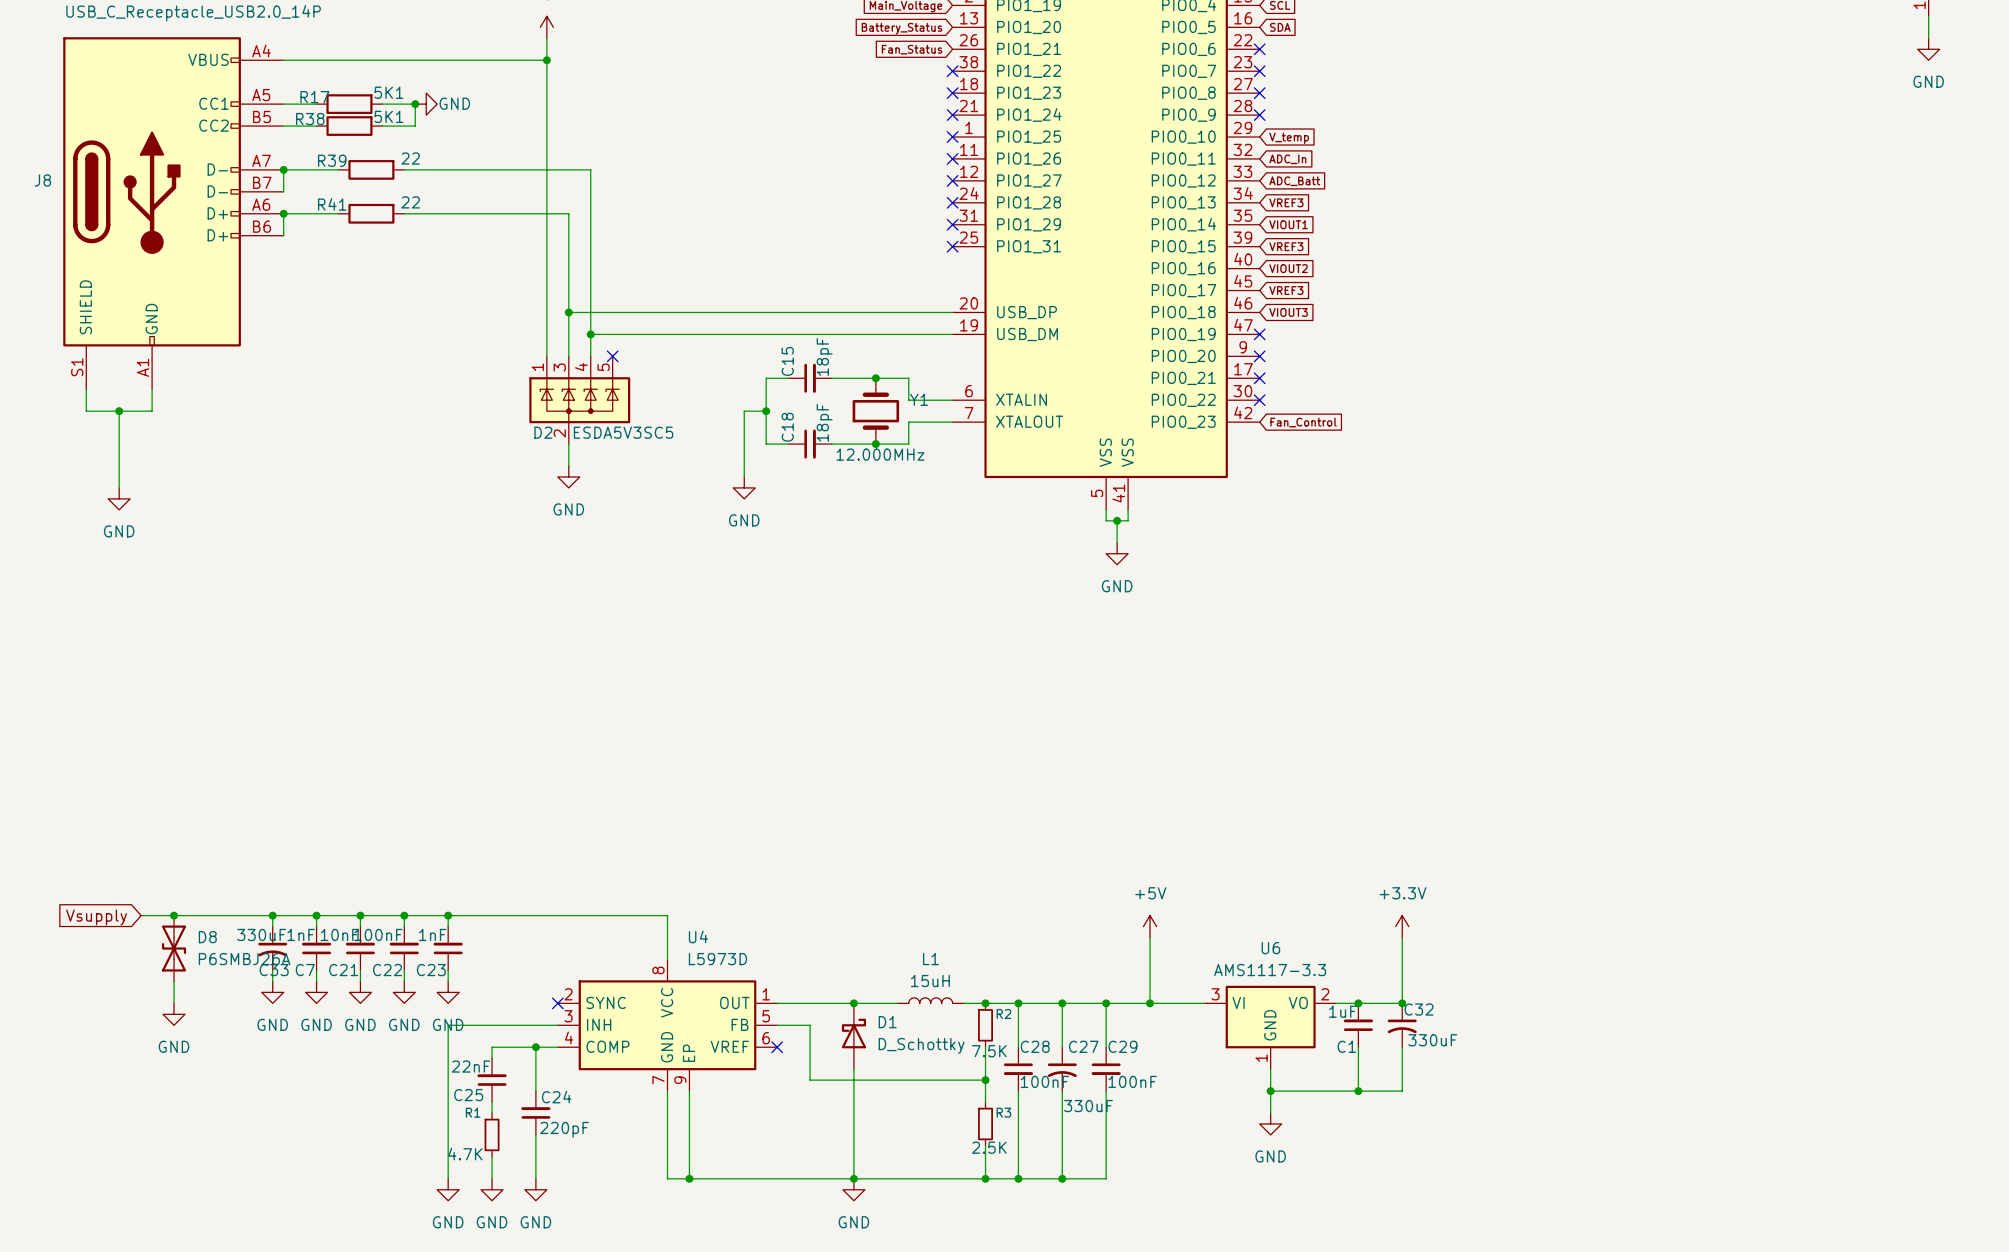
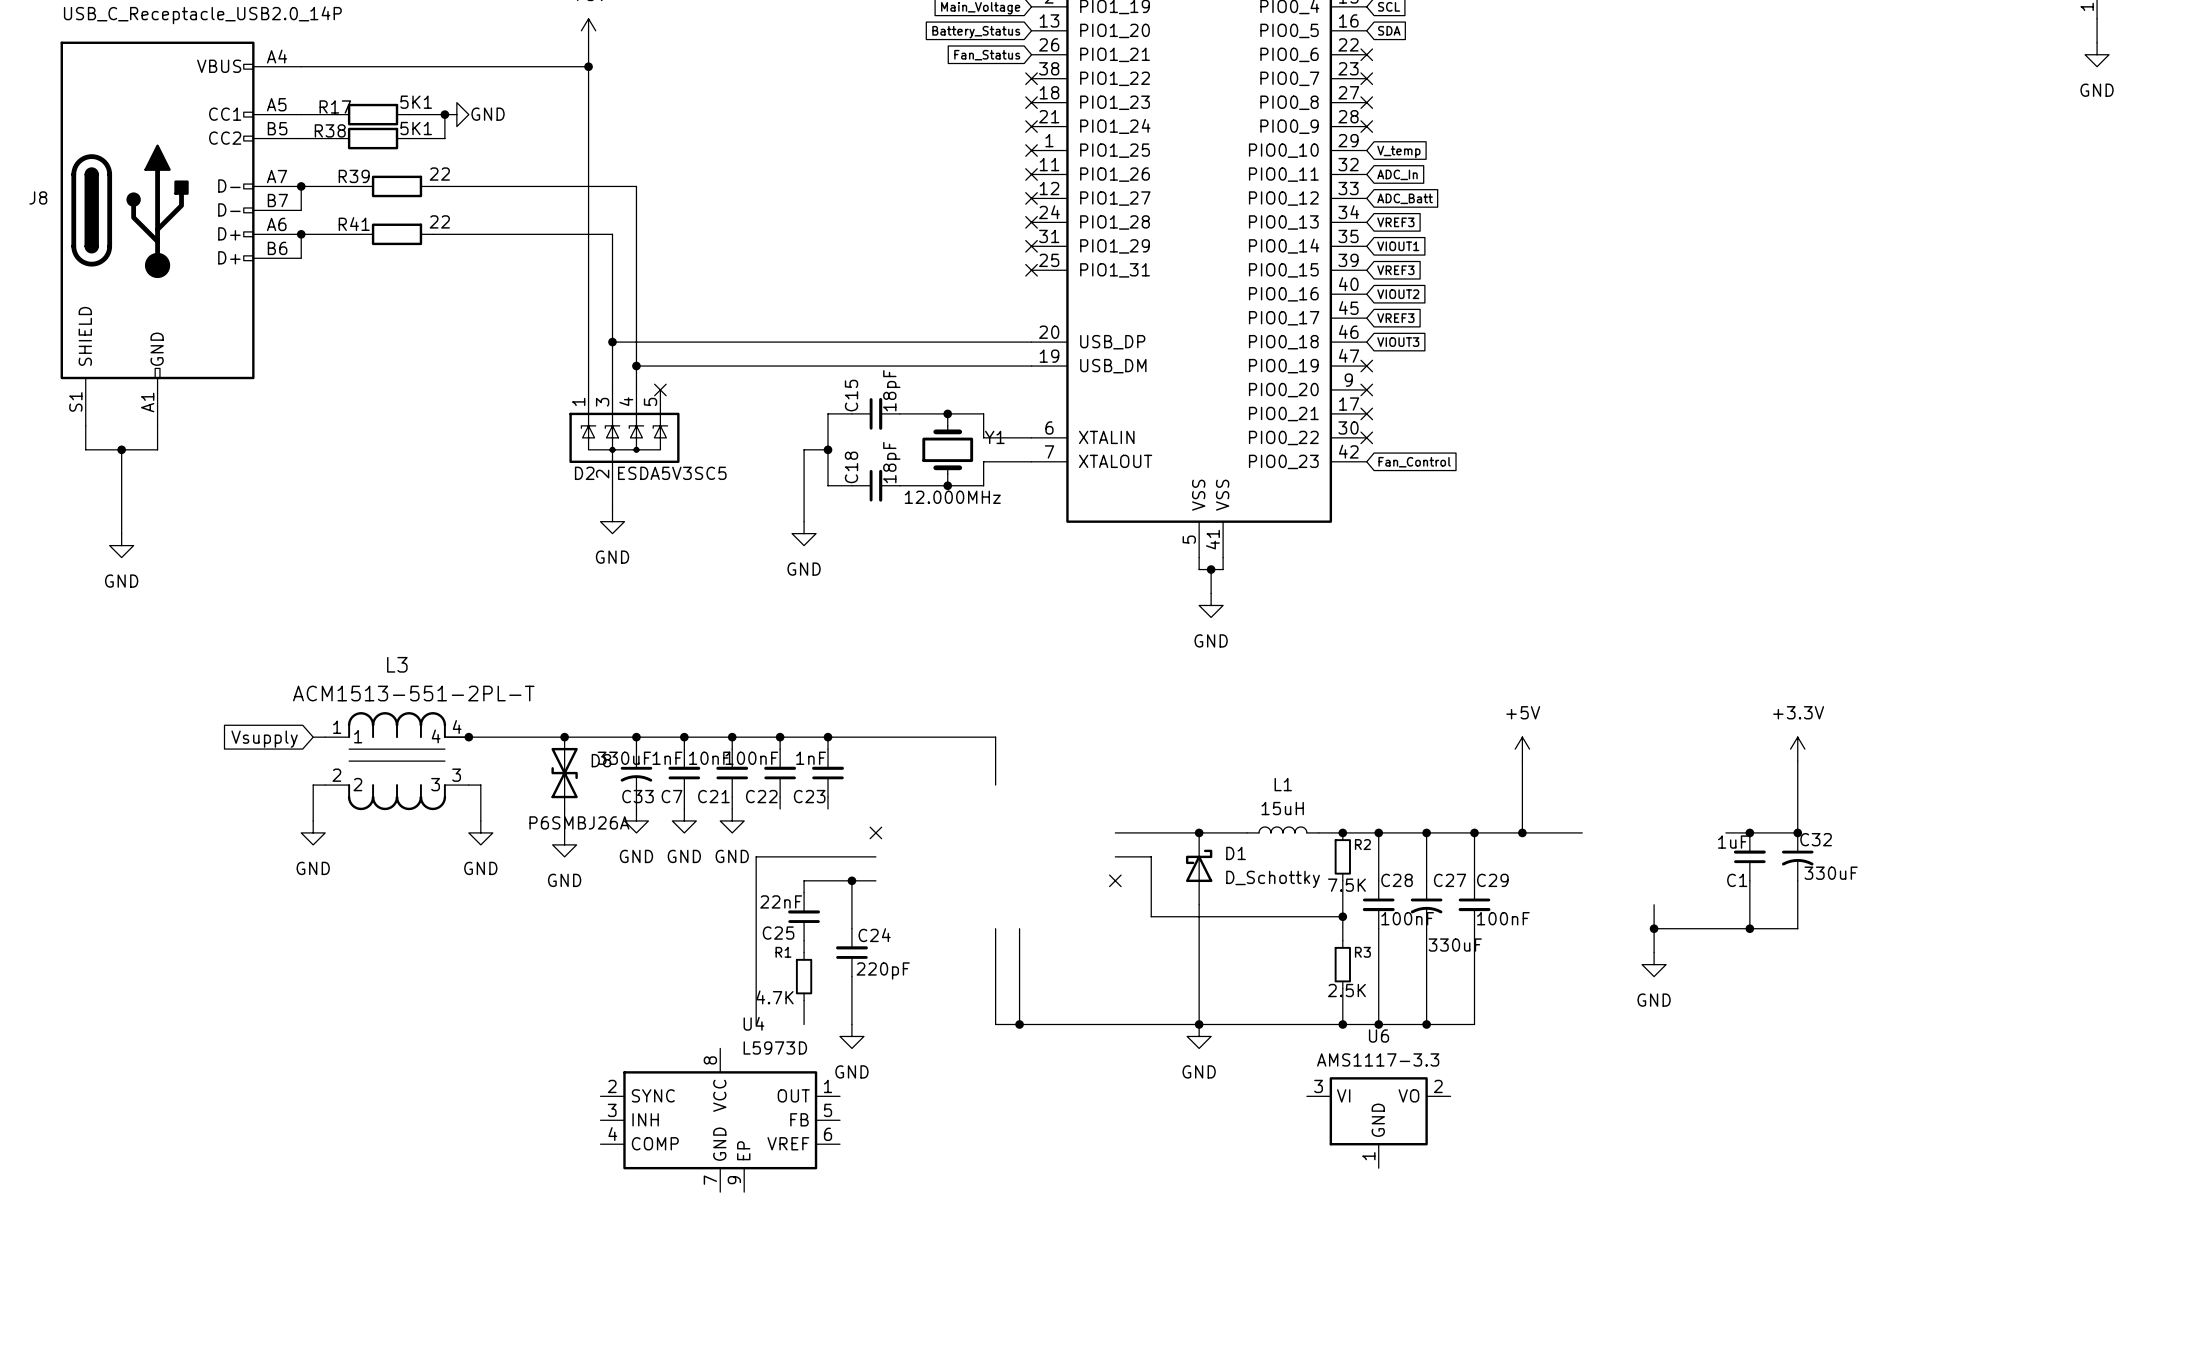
wire: none -> (313, 737) (325, 737)
wire: none -> (444, 737) (995, 737) (995, 785)
junction: none -> (468, 737)
junction: none -> (564, 737)
wire: none -> (636, 737) (636, 749)
junction: none -> (636, 737)
wire: none -> (684, 737) (684, 749)
junction: none -> (684, 737)
wire: none -> (732, 737) (732, 749)
junction: none -> (732, 737)
wire: none -> (780, 737) (780, 749)
junction: none -> (780, 737)
wire: none -> (828, 737) (828, 749)
junction: none -> (828, 737)
global label: none -> Vsupply (264, 739)
power symbol: none -> +5V (1522, 749)
power symbol: none -> +3.3V (1797, 749)
L3: none -> ACM1513-551-2PL-T (397, 761)
wire: none -> (1522, 761) (1522, 832)
wire: none -> (1797, 761) (1797, 832) (1725, 832)
wire: none -> (325, 785) (313, 785) (313, 820)
wire: none -> (468, 785) (480, 785) (480, 820)
wire: none -> (636, 797) (636, 808)
wire: none -> (684, 797) (684, 808)
wire: none -> (732, 797) (732, 808)
wire: none -> (780, 797) (780, 808)
wire: none -> (828, 797) (828, 808)
wire: none -> (564, 808) (564, 832)
power symbol: none -> GND (636, 820)
power symbol: none -> GND (684, 820)
power symbol: none -> GND (732, 820)
power symbol: none -> GND (313, 832)
power symbol: none -> GND (480, 832)
no-connect mark: none -> (875, 832)
wire: none -> (1115, 832) (1247, 832)
junction: none -> (1199, 832)
wire: none -> (1318, 832) (1582, 832)
junction: none -> (1342, 832)
wire: none -> (1378, 832) (1378, 880)
junction: none -> (1378, 832)
wire: none -> (1426, 832) (1426, 880)
junction: none -> (1426, 832)
wire: none -> (1474, 832) (1474, 880)
junction: none -> (1474, 832)
junction: none -> (1522, 832)
junction: none -> (1749, 832)
junction: none -> (1797, 832)
power symbol: none -> GND (564, 844)
wire: none -> (875, 856) (756, 856) (756, 1024)
wire: none -> (1115, 856) (1151, 856) (1151, 916) (1342, 916)
wire: none -> (851, 880) (851, 928)
junction: none -> (851, 880)
wire: none -> (875, 880) (804, 880) (804, 892)
no-connect mark: none -> (1115, 880)
wire: none -> (1342, 880) (1342, 940)
wire: none -> (1749, 880) (1749, 928)
wire: none -> (1797, 880) (1797, 928) (1654, 928)
wire: none -> (1199, 904) (1199, 1024)
wire: none -> (1654, 904) (1654, 952)
junction: none -> (1342, 916)
wire: none -> (995, 928) (995, 1024) (1474, 1024) (1474, 928)
wire: none -> (1019, 928) (1019, 1024)
wire: none -> (1378, 928) (1378, 1024)
wire: none -> (1426, 928) (1426, 1024)
junction: none -> (1654, 928)
junction: none -> (1749, 928)
wire: none -> (804, 940) (804, 952)
power symbol: none -> GND (1654, 964)
wire: none -> (851, 976) (851, 1024)
wire: none -> (1342, 988) (1342, 1024)
wire: (141, 915) (667, 915) (667, 959) -> none
junction: (174, 915) -> none
wire: (272, 915) (272, 926) -> none
junction: (272, 915) -> none
wire: (316, 915) (316, 926) -> none
junction: (316, 915) -> none
wire: (360, 915) (360, 926) -> none
junction: (360, 915) -> none
wire: (404, 915) (404, 926) -> none
junction: (404, 915) -> none
wire: (448, 915) (448, 926) -> none
junction: (448, 915) -> none
wire: none -> (804, 1000) (804, 1024)
global label: Vsupply (96, 917) -> none
power symbol: +5V (1150, 926) -> none
power symbol: +3.3V (1402, 926) -> none
junction: none -> (1019, 1024)
junction: none -> (1199, 1024)
wire: (1150, 937) (1150, 1003) -> none
junction: none -> (1342, 1024)
junction: none -> (1378, 1024)
junction: none -> (1426, 1024)
wire: (1402, 937) (1402, 1003) (1336, 1003) -> none
D8 position: (174, 948) -> (564, 773)
C33 position: (272, 948) -> (636, 773)
C7 position: (316, 948) -> (684, 773)
C21 position: (360, 948) -> (732, 773)
C22 position: (404, 948) -> (780, 773)
C23 position: (448, 948) -> (828, 773)
power symbol: none -> GND (851, 1036)
power symbol: none -> GND (1199, 1036)
D8 value position: P6SMBJ26A (244, 959) -> P6SMBJ26A (579, 822)
wire: (272, 970) (272, 981) -> none
wire: (316, 970) (316, 981) -> none
wire: (360, 970) (360, 981) -> none
wire: (404, 970) (404, 981) -> none
wire: (448, 970) (448, 981) -> none
wire: (174, 981) (174, 1003) -> none
power symbol: GND (272, 992) -> none
power symbol: GND (316, 992) -> none
power symbol: GND (360, 992) -> none
power symbol: GND (404, 992) -> none
power symbol: GND (448, 992) -> none
L1 position: (930, 1000) -> (1282, 829)
no-connect mark: (557, 1003) -> none
wire: (777, 1003) (897, 1003) -> none
junction: (853, 1003) -> none
wire: (963, 1003) (1204, 1003) -> none
junction: (985, 1003) -> none
wire: (1018, 1003) (1018, 1047) -> none
junction: (1018, 1003) -> none
wire: (1062, 1003) (1062, 1047) -> none
junction: (1062, 1003) -> none
wire: (1106, 1003) (1106, 1047) -> none
junction: (1106, 1003) -> none
junction: (1150, 1003) -> none
junction: (1358, 1003) -> none
junction: (1402, 1003) -> none
power symbol: GND (174, 1014) -> none
wire: (557, 1025) (448, 1025) (448, 1178) -> none
wire: (777, 1025) (810, 1025) (810, 1080) (985, 1080) -> none
R2 position: (985, 1025) -> (1342, 856)
C1 position: (1358, 1025) -> (1749, 856)
C32 position: (1402, 1025) -> (1797, 856)
D1 position: (853, 1036) -> (1199, 868)
wire: (535, 1047) (535, 1091) -> none
junction: (535, 1047) -> none
wire: (557, 1047) (492, 1047) (492, 1058) -> none
no-connect mark: (777, 1047) -> none
wire: (985, 1047) (985, 1102) -> none
wire: (1358, 1047) (1358, 1091) -> none
wire: (1402, 1047) (1402, 1091) (1270, 1091) -> none
wire: (853, 1069) (853, 1178) -> none
C28 position: (1018, 1069) -> (1378, 904)
C27 position: (1062, 1069) -> (1426, 904)
C29 position: (1106, 1069) -> (1474, 904)
wire: (1270, 1069) (1270, 1113) -> none
C25 position: (492, 1080) -> (804, 916)
junction: (985, 1080) -> none
wire: (667, 1091) (667, 1178) (1106, 1178) (1106, 1091) -> none
wire: (689, 1091) (689, 1178) -> none
wire: (1018, 1091) (1018, 1178) -> none
wire: (1062, 1091) (1062, 1178) -> none
junction: (1270, 1091) -> none
junction: (1358, 1091) -> none
wire: (492, 1102) (492, 1113) -> none
C24 position: (535, 1113) -> (851, 952)
R3 position: (985, 1123) -> (1342, 964)
power symbol: GND (1270, 1123) -> none
R1 position: (492, 1134) -> (804, 976)
wire: (535, 1134) (535, 1178) -> none
wire: (985, 1145) (985, 1178) -> none
wire: (492, 1156) (492, 1178) -> none
junction: (689, 1178) -> none
junction: (853, 1178) -> none
junction: (985, 1178) -> none
junction: (1018, 1178) -> none
junction: (1062, 1178) -> none
power symbol: GND (448, 1189) -> none
power symbol: GND (492, 1189) -> none
power symbol: GND (535, 1189) -> none
power symbol: GND (853, 1189) -> none

